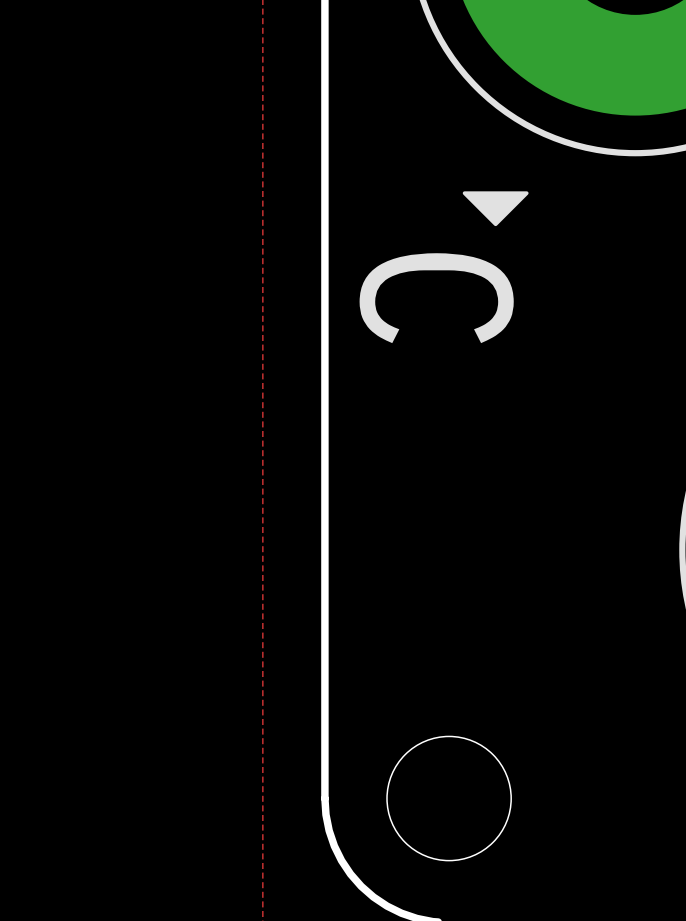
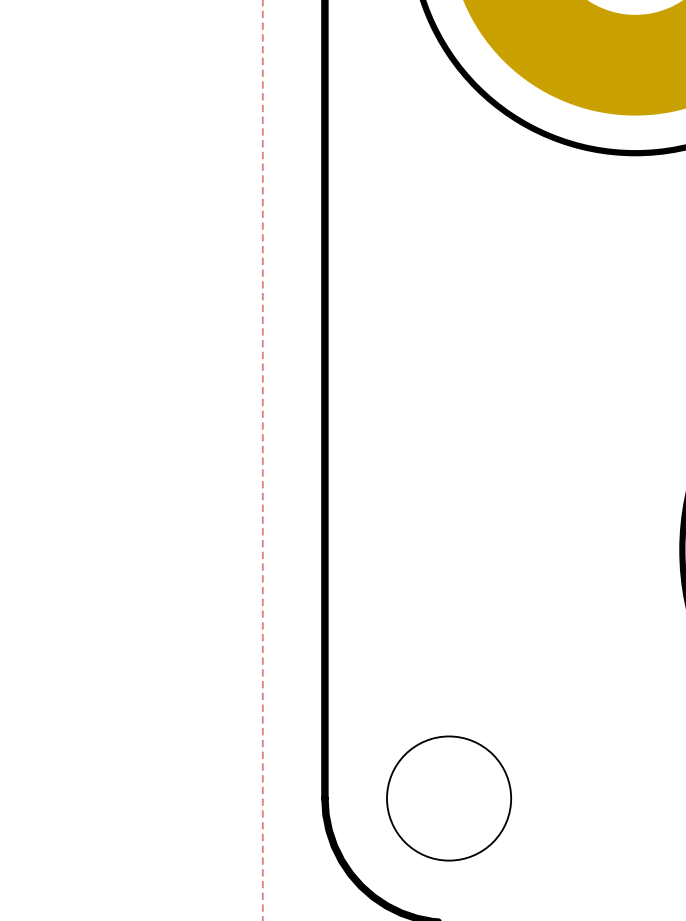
drawing: [462, 191, 529, 227] -> none
text: C (436, 298) -> none

